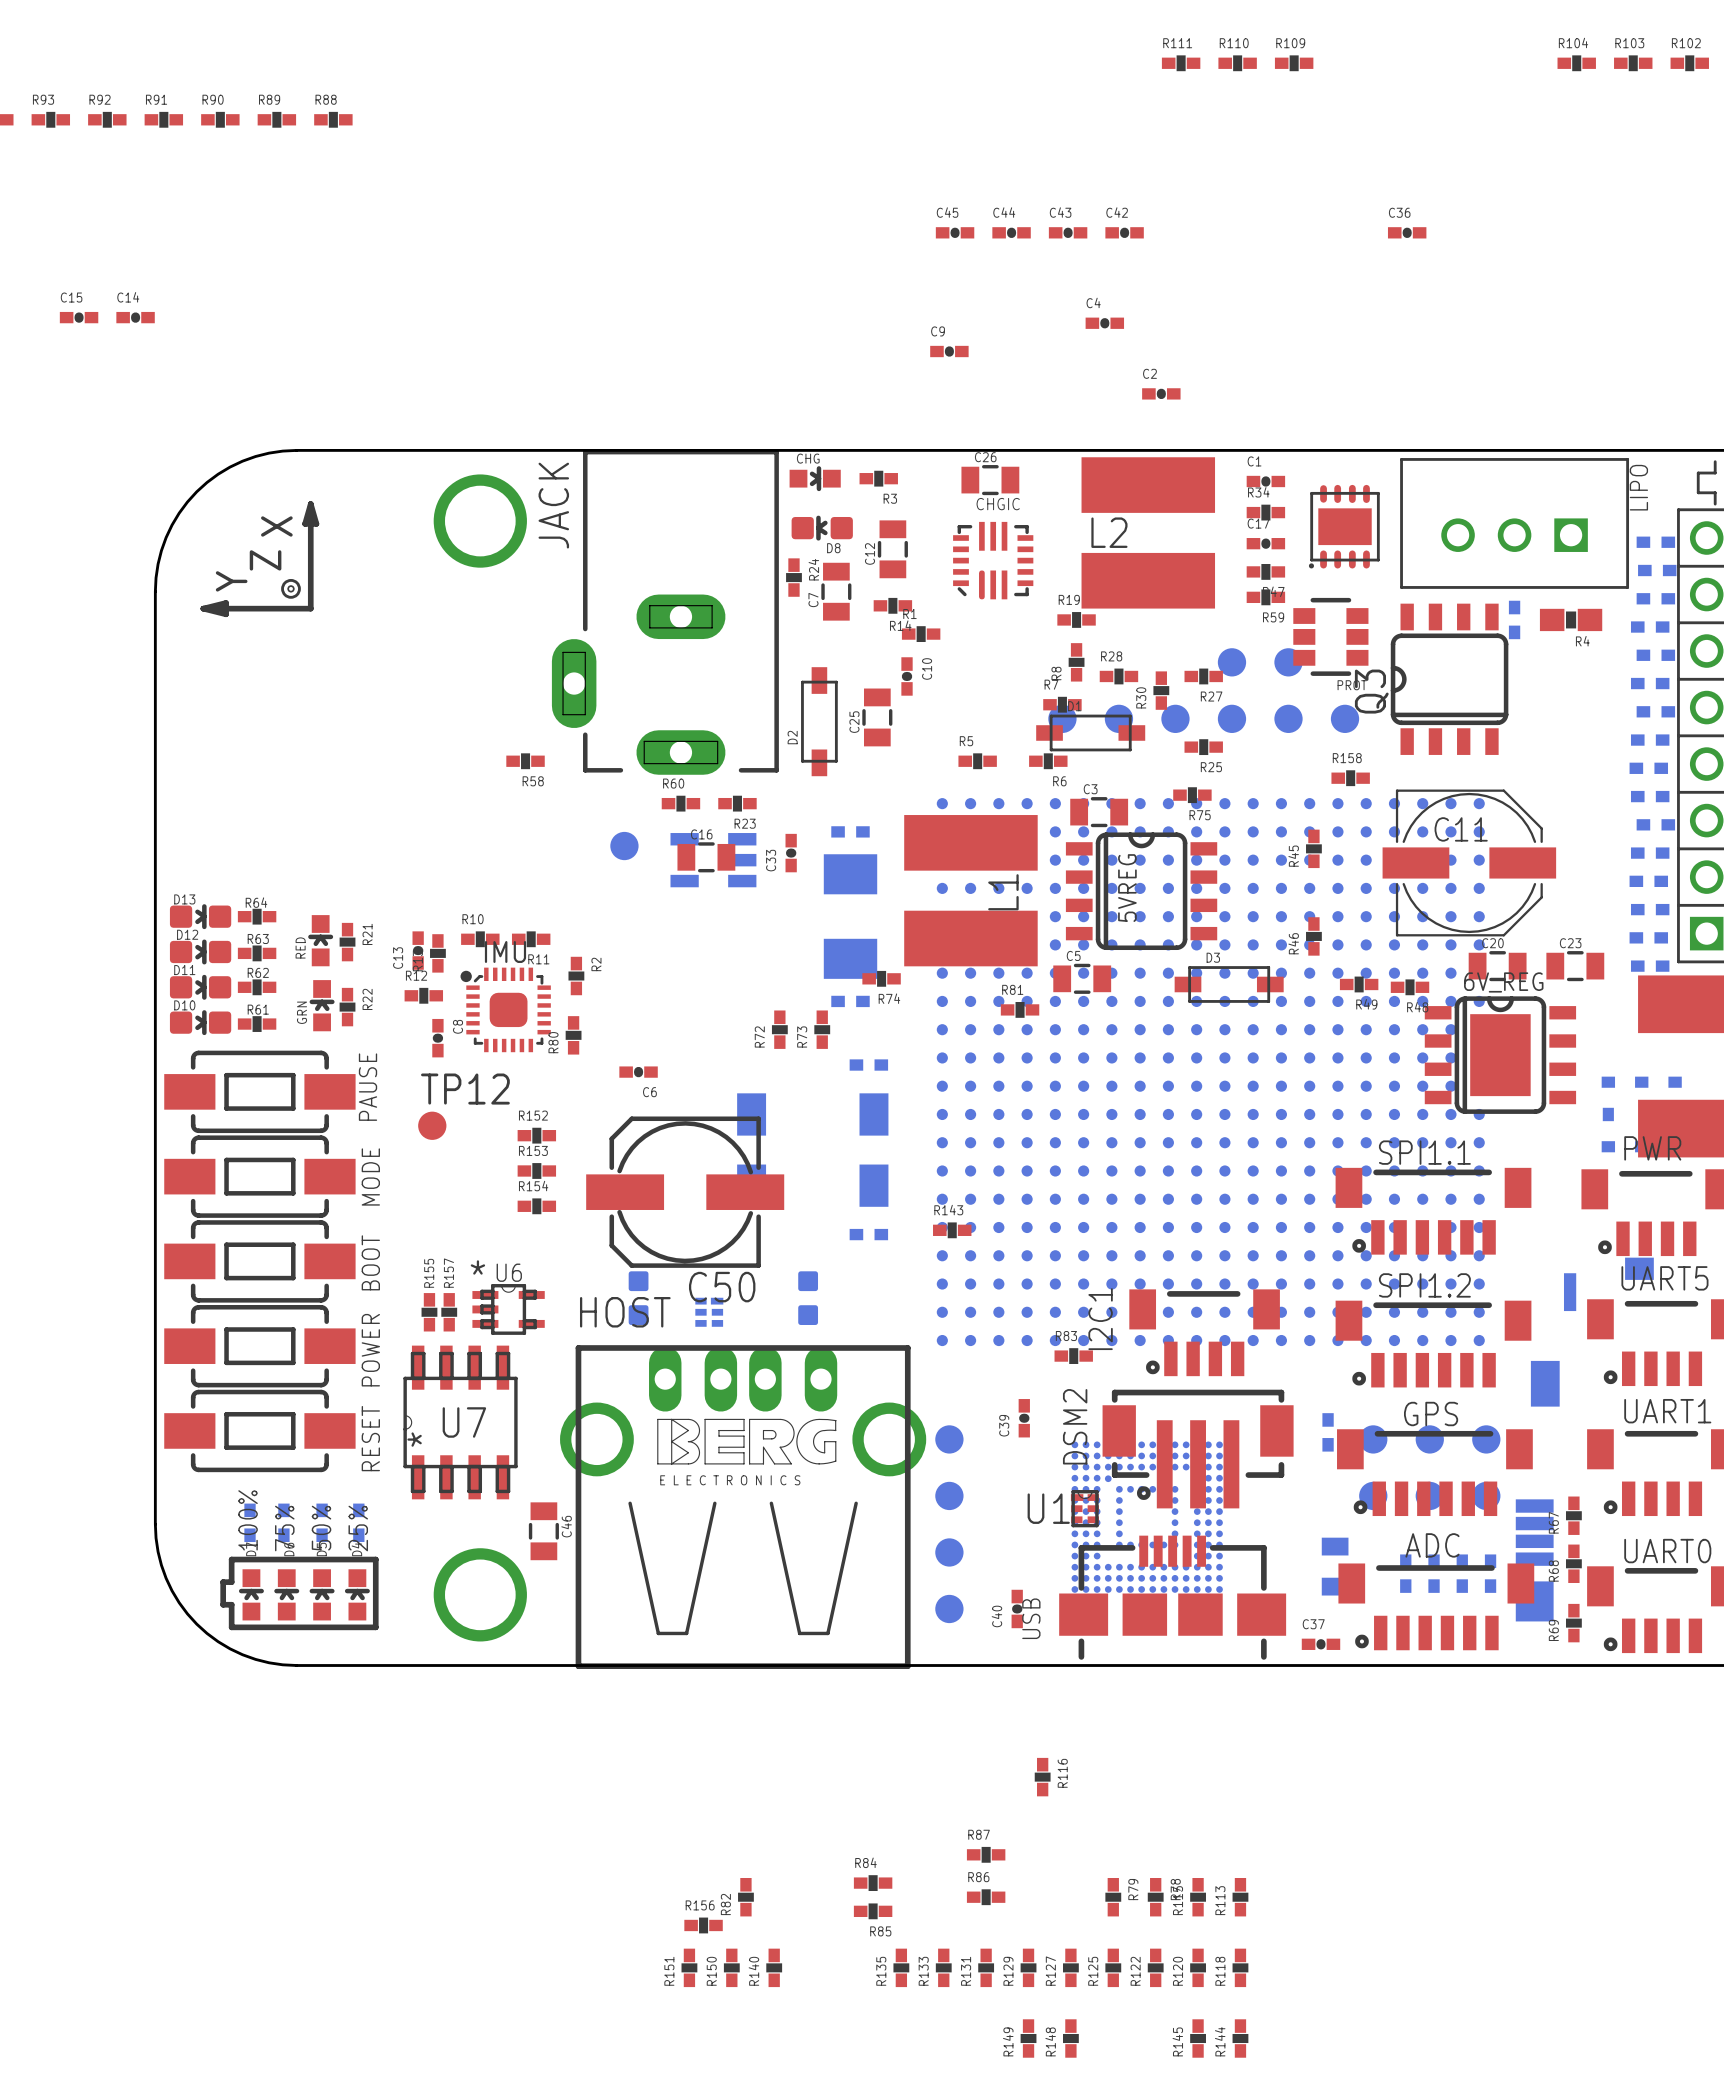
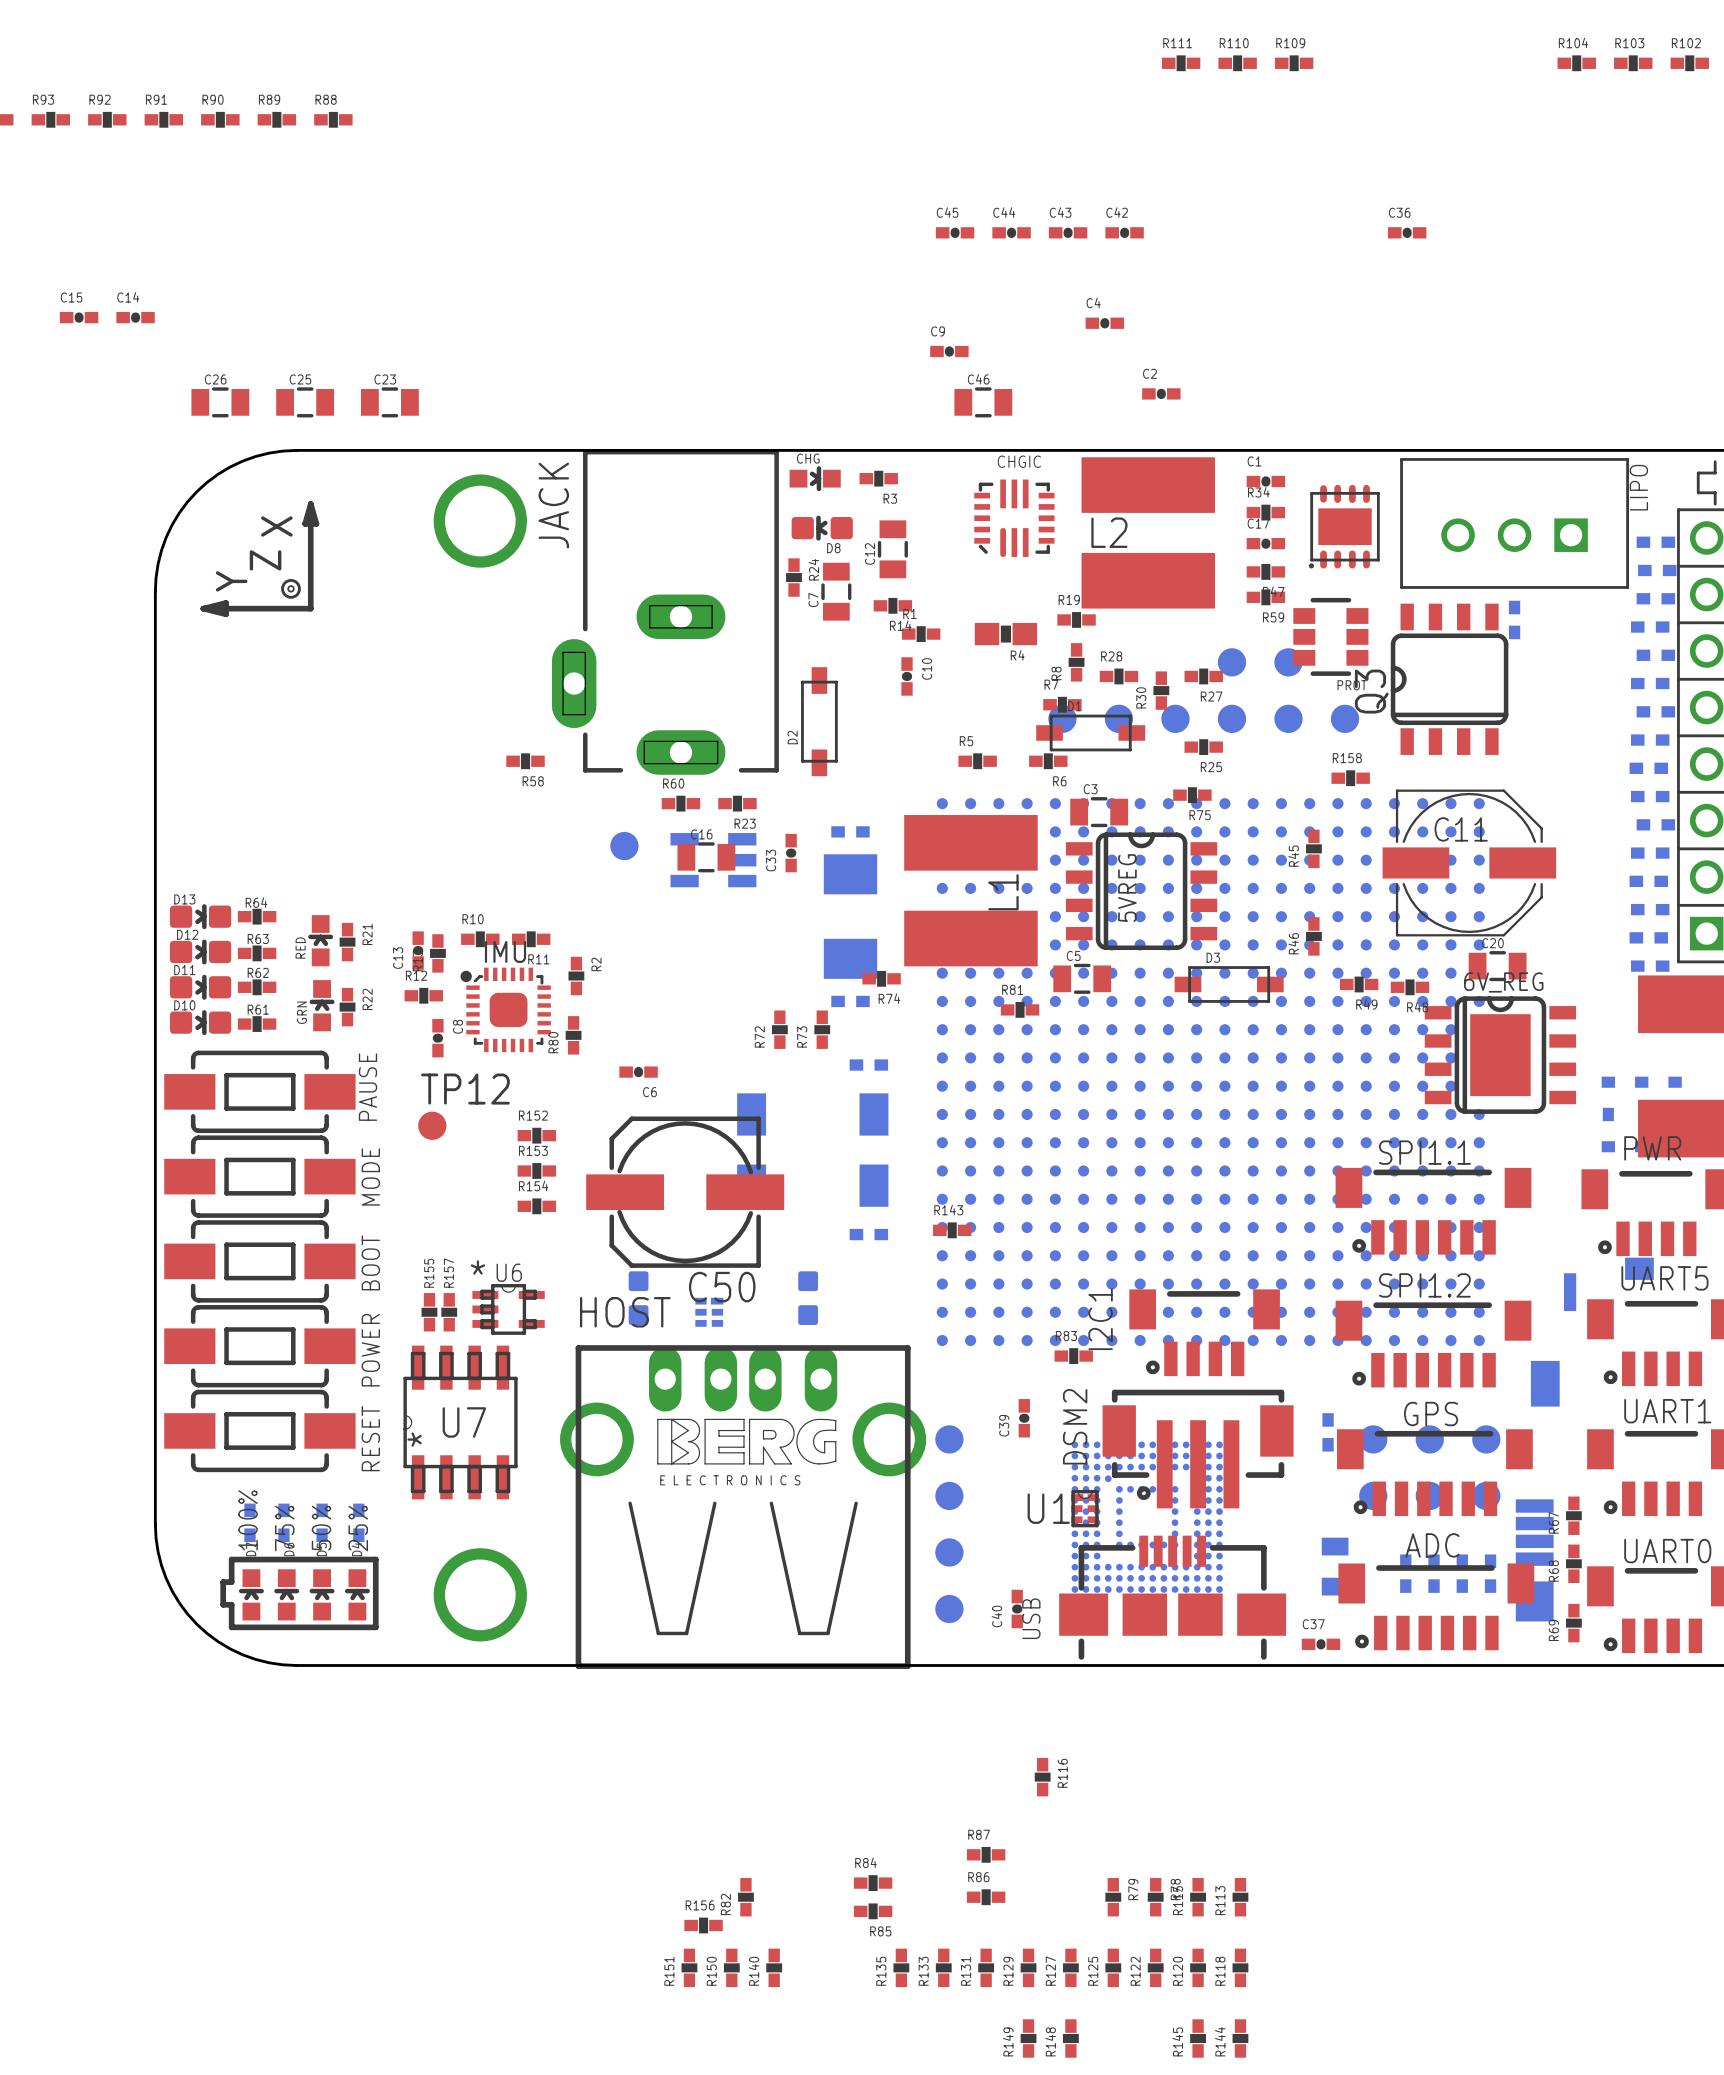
C26 position: (990, 480) -> (220, 402)
CHGIC position: (993, 560) -> (1014, 518)
R4 position: (1571, 619) -> (1005, 634)
C25 rotation: 0° (877, 717) -> 90° clockwise (305, 402)
C25 position: (877, 717) -> (305, 402)
C23 position: (1575, 966) -> (389, 402)
C46 rotation: 0° (543, 1531) -> 90° clockwise (983, 402)
C46 position: (543, 1531) -> (983, 402)

